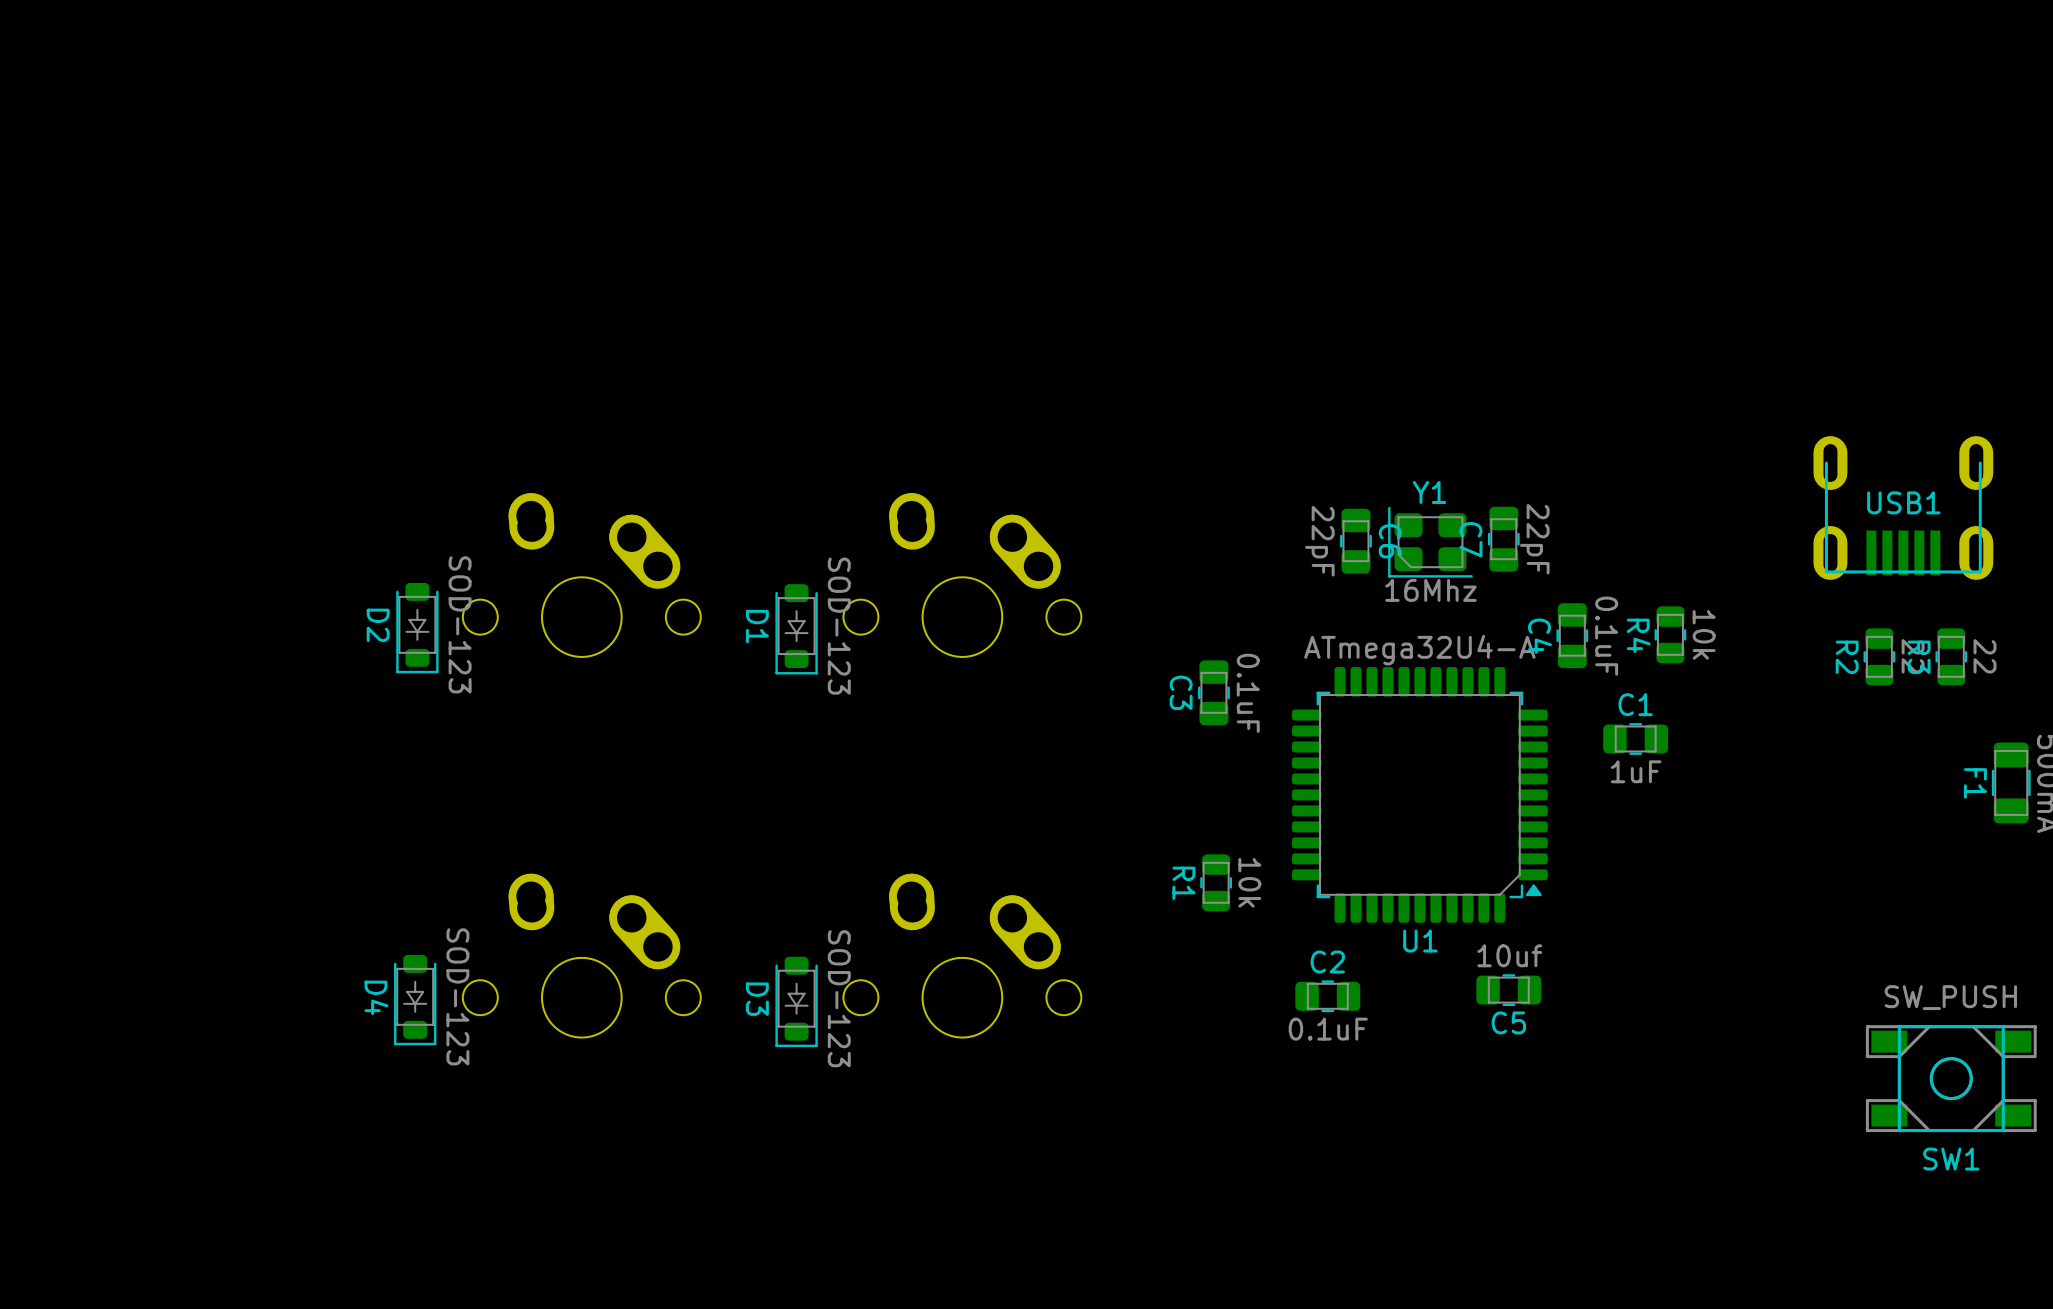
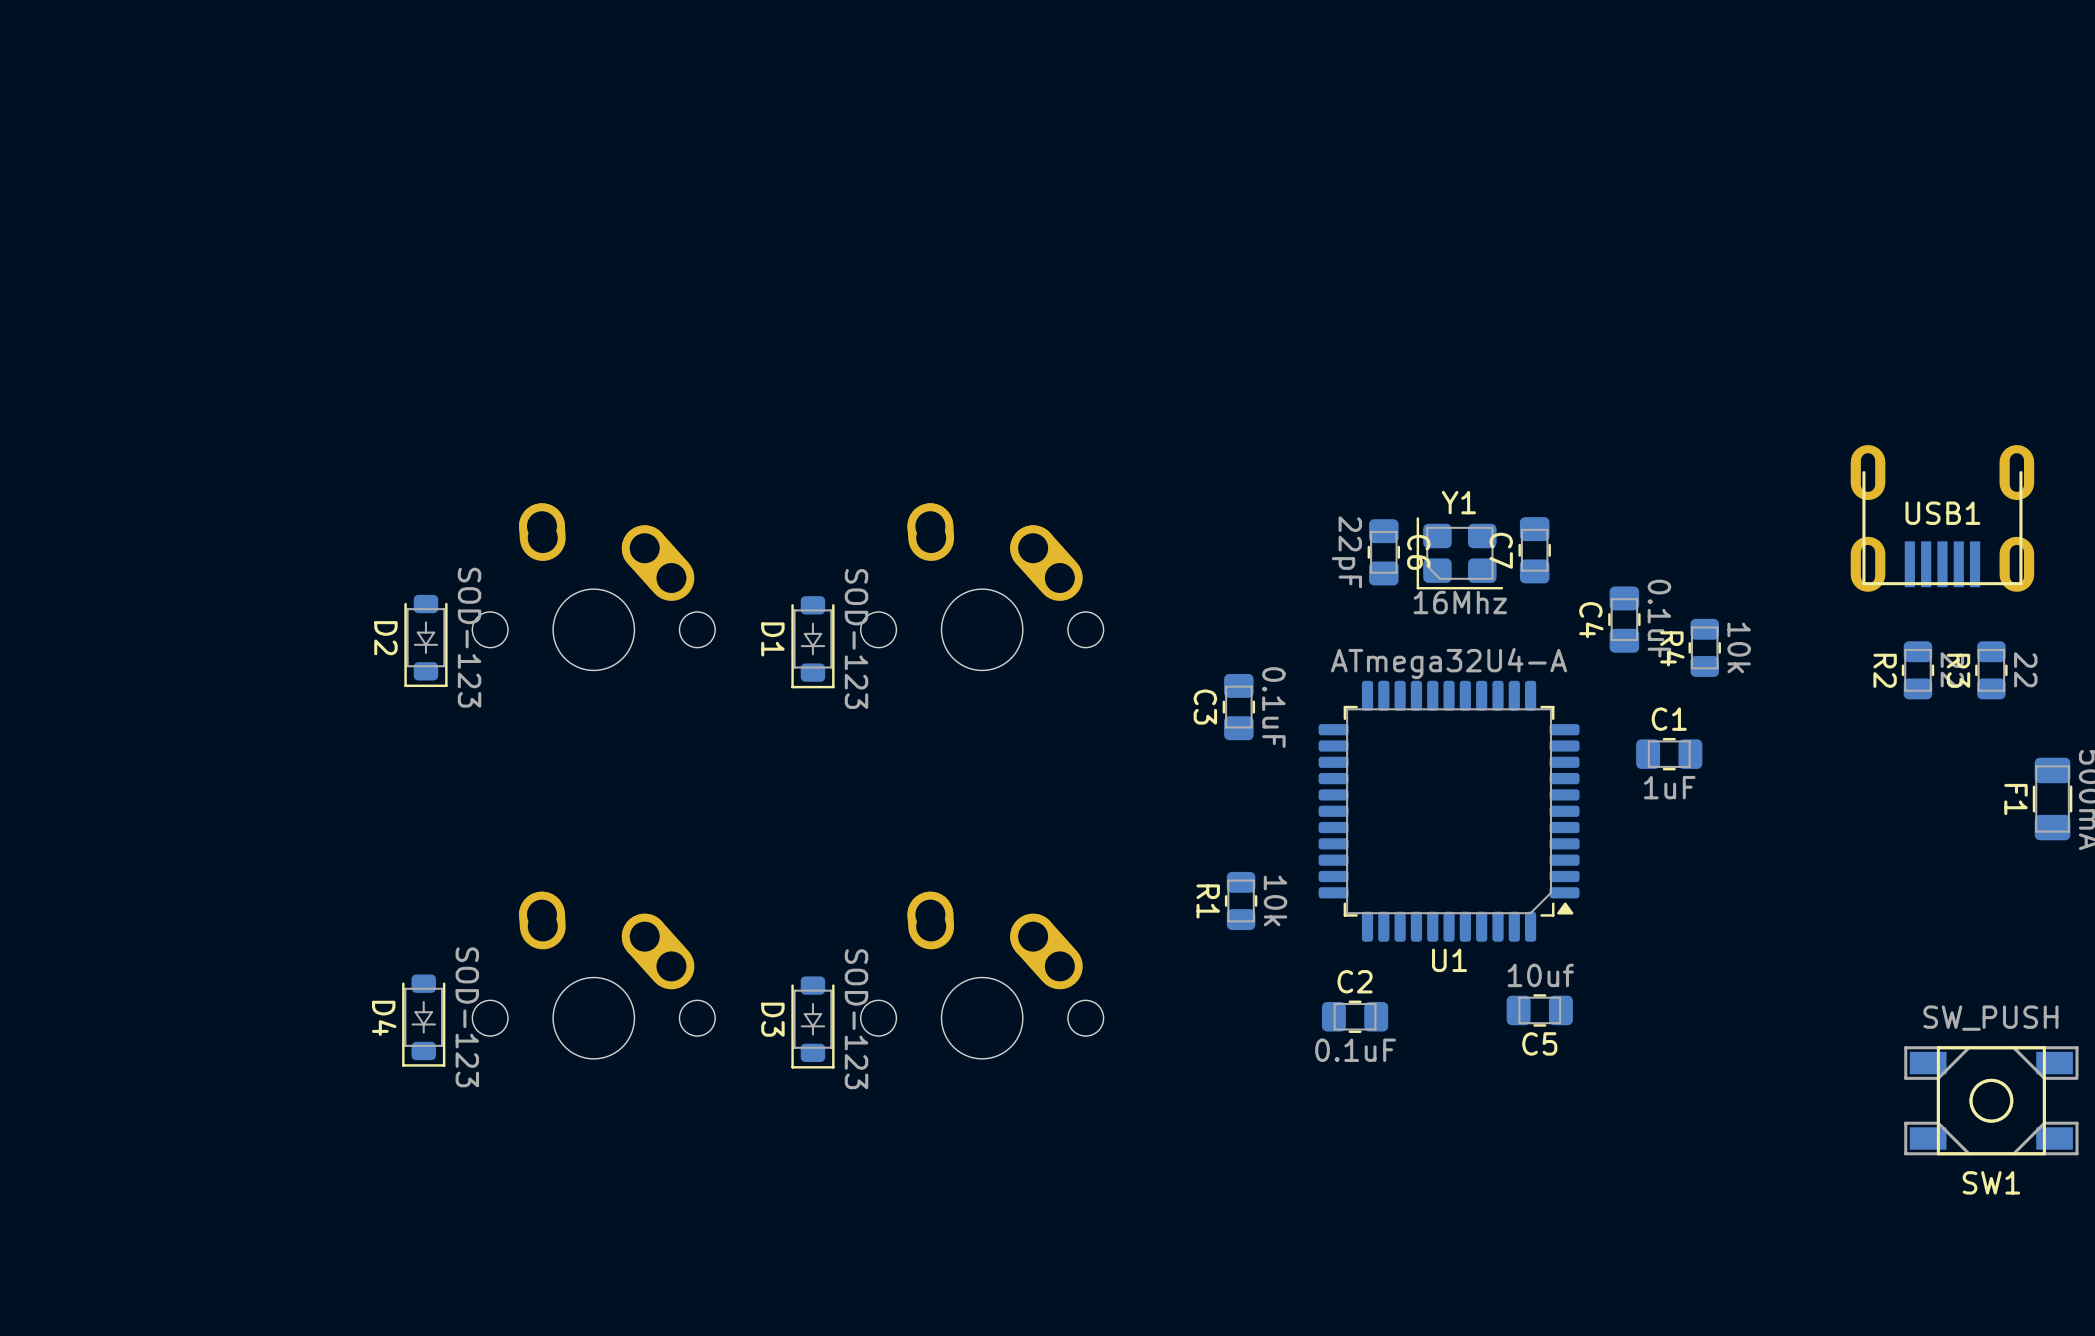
C7 value: 22pF (1534, 539) -> none
C4 position: (1572, 635) -> (1624, 619)

